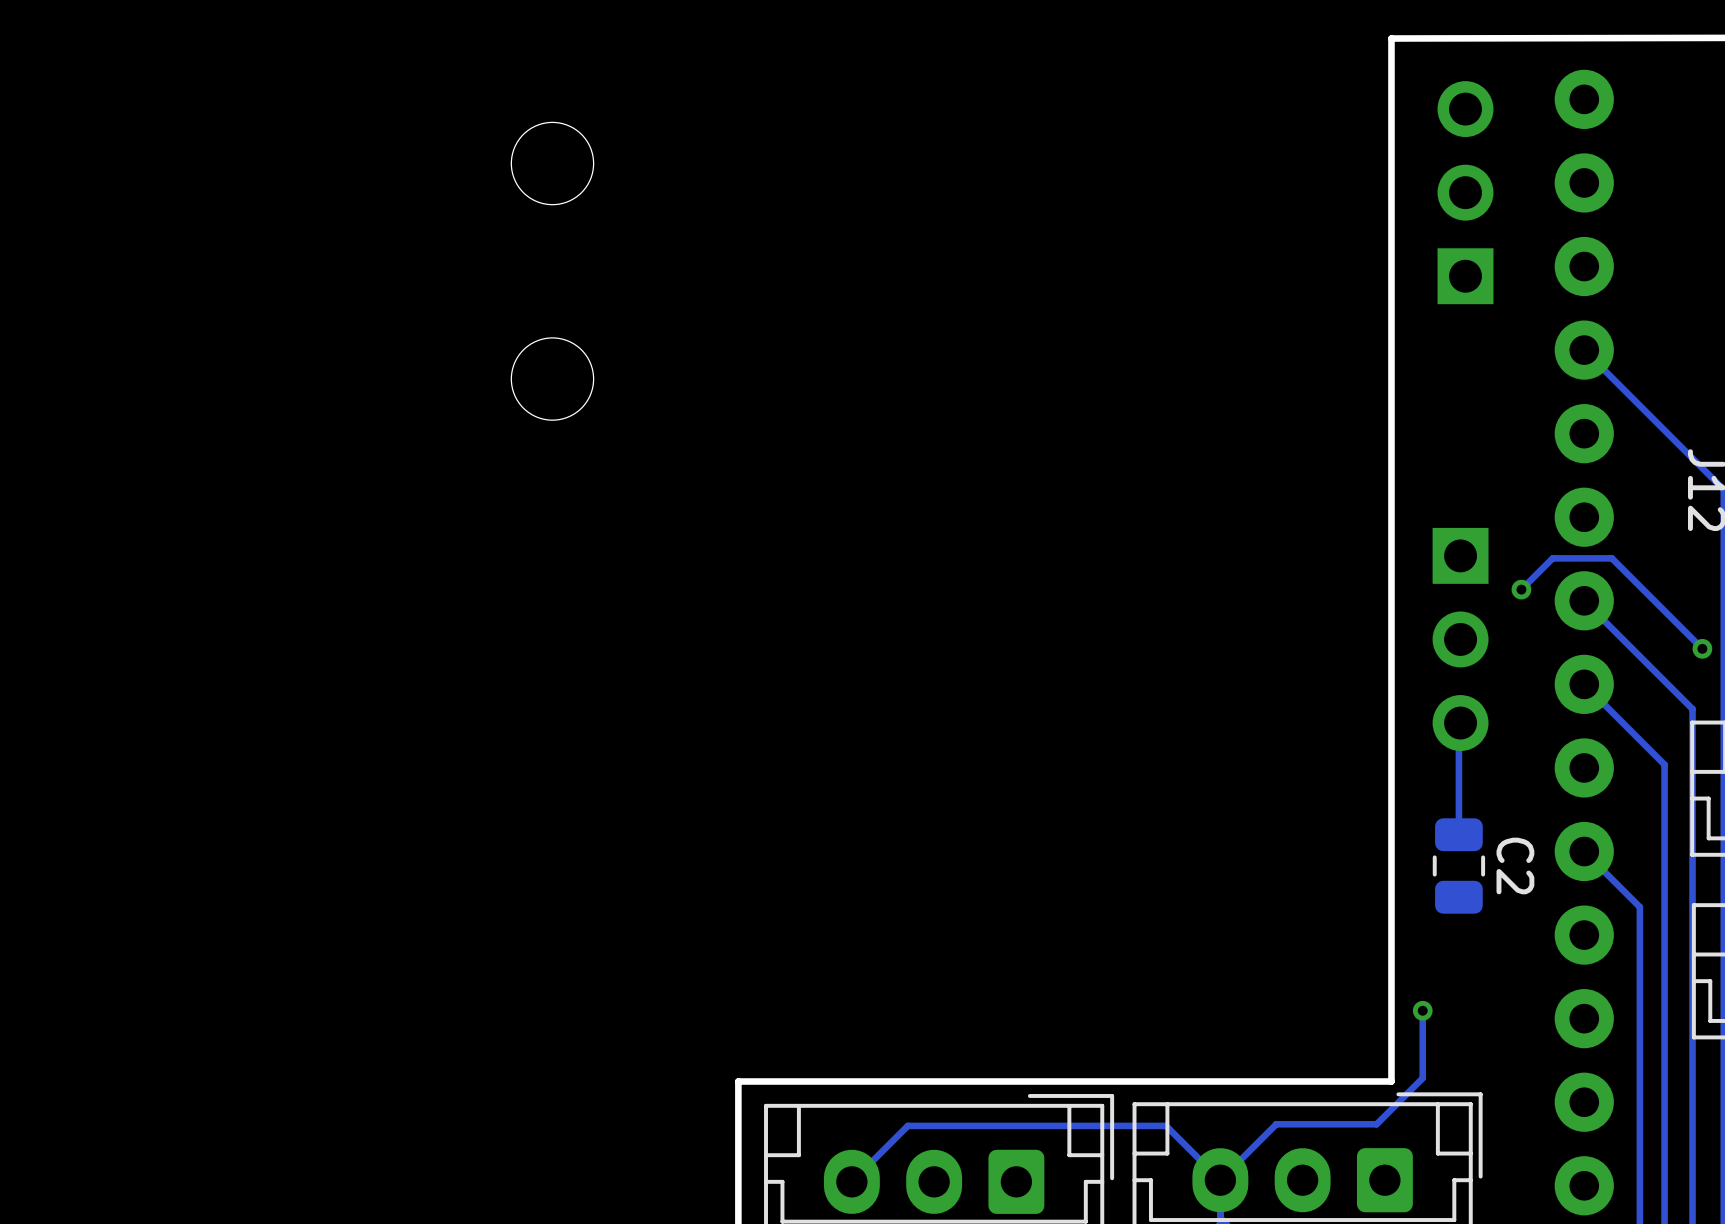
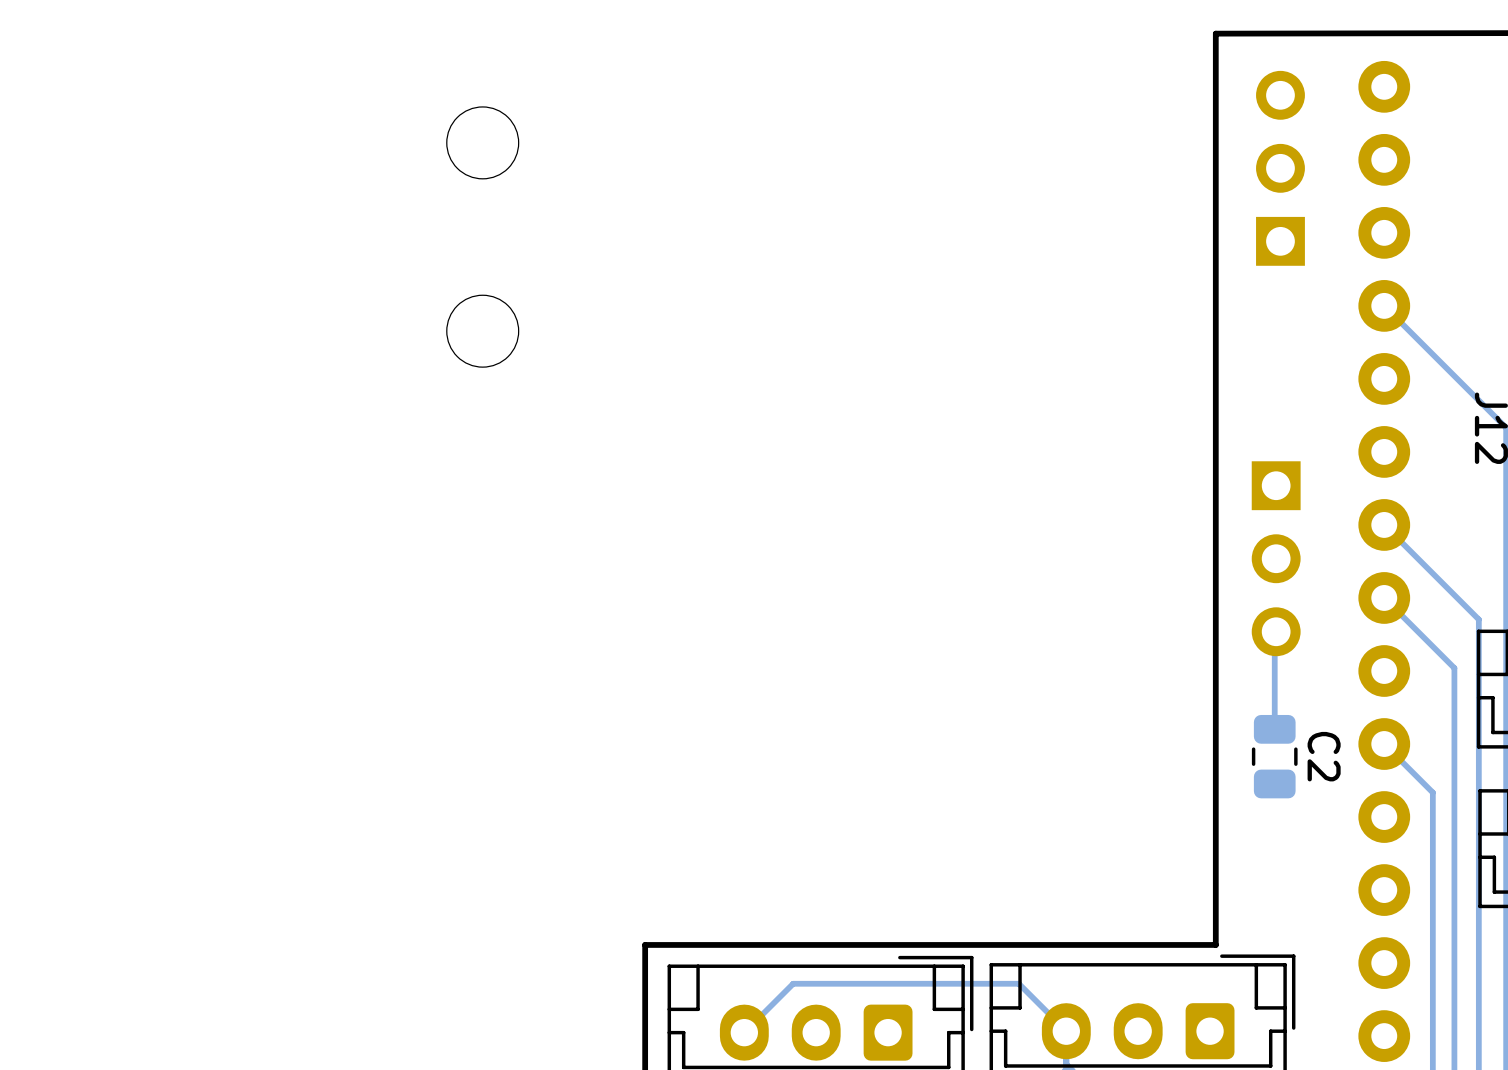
track: (1521, 589) (1552, 558) (1611, 558) (1702, 648) -> none
via: (1521, 589) -> none
via: (1702, 648) -> none
track: (1422, 1010) (1422, 1078) (1376, 1124) (1276, 1124) (1220, 1180) -> none
via: (1422, 1010) -> none

